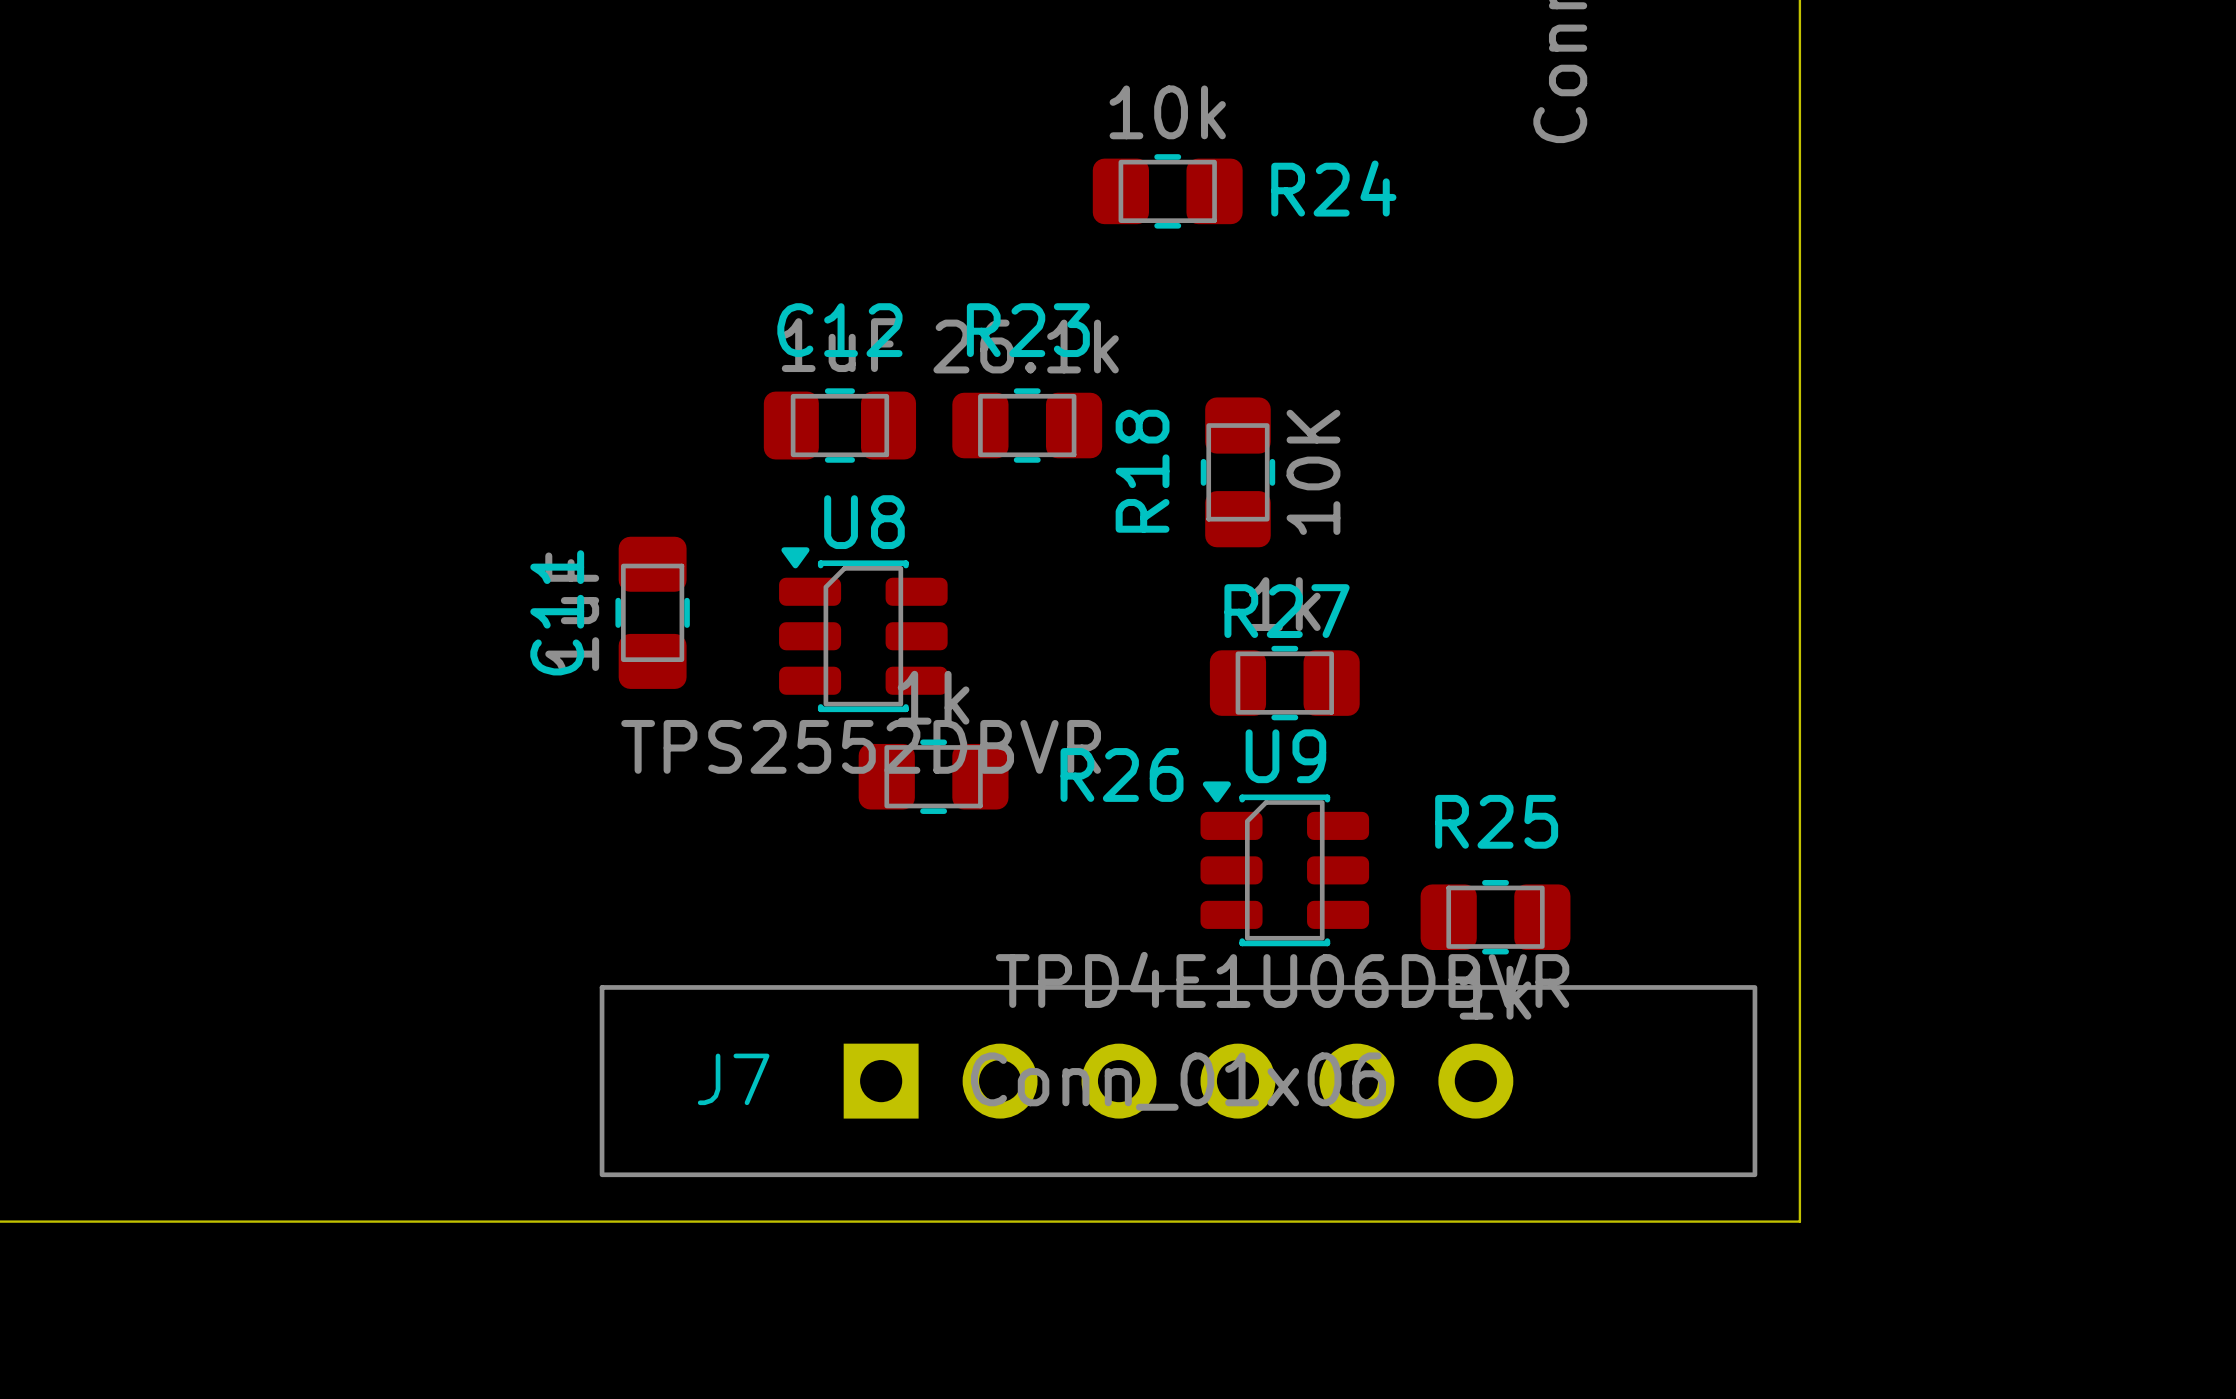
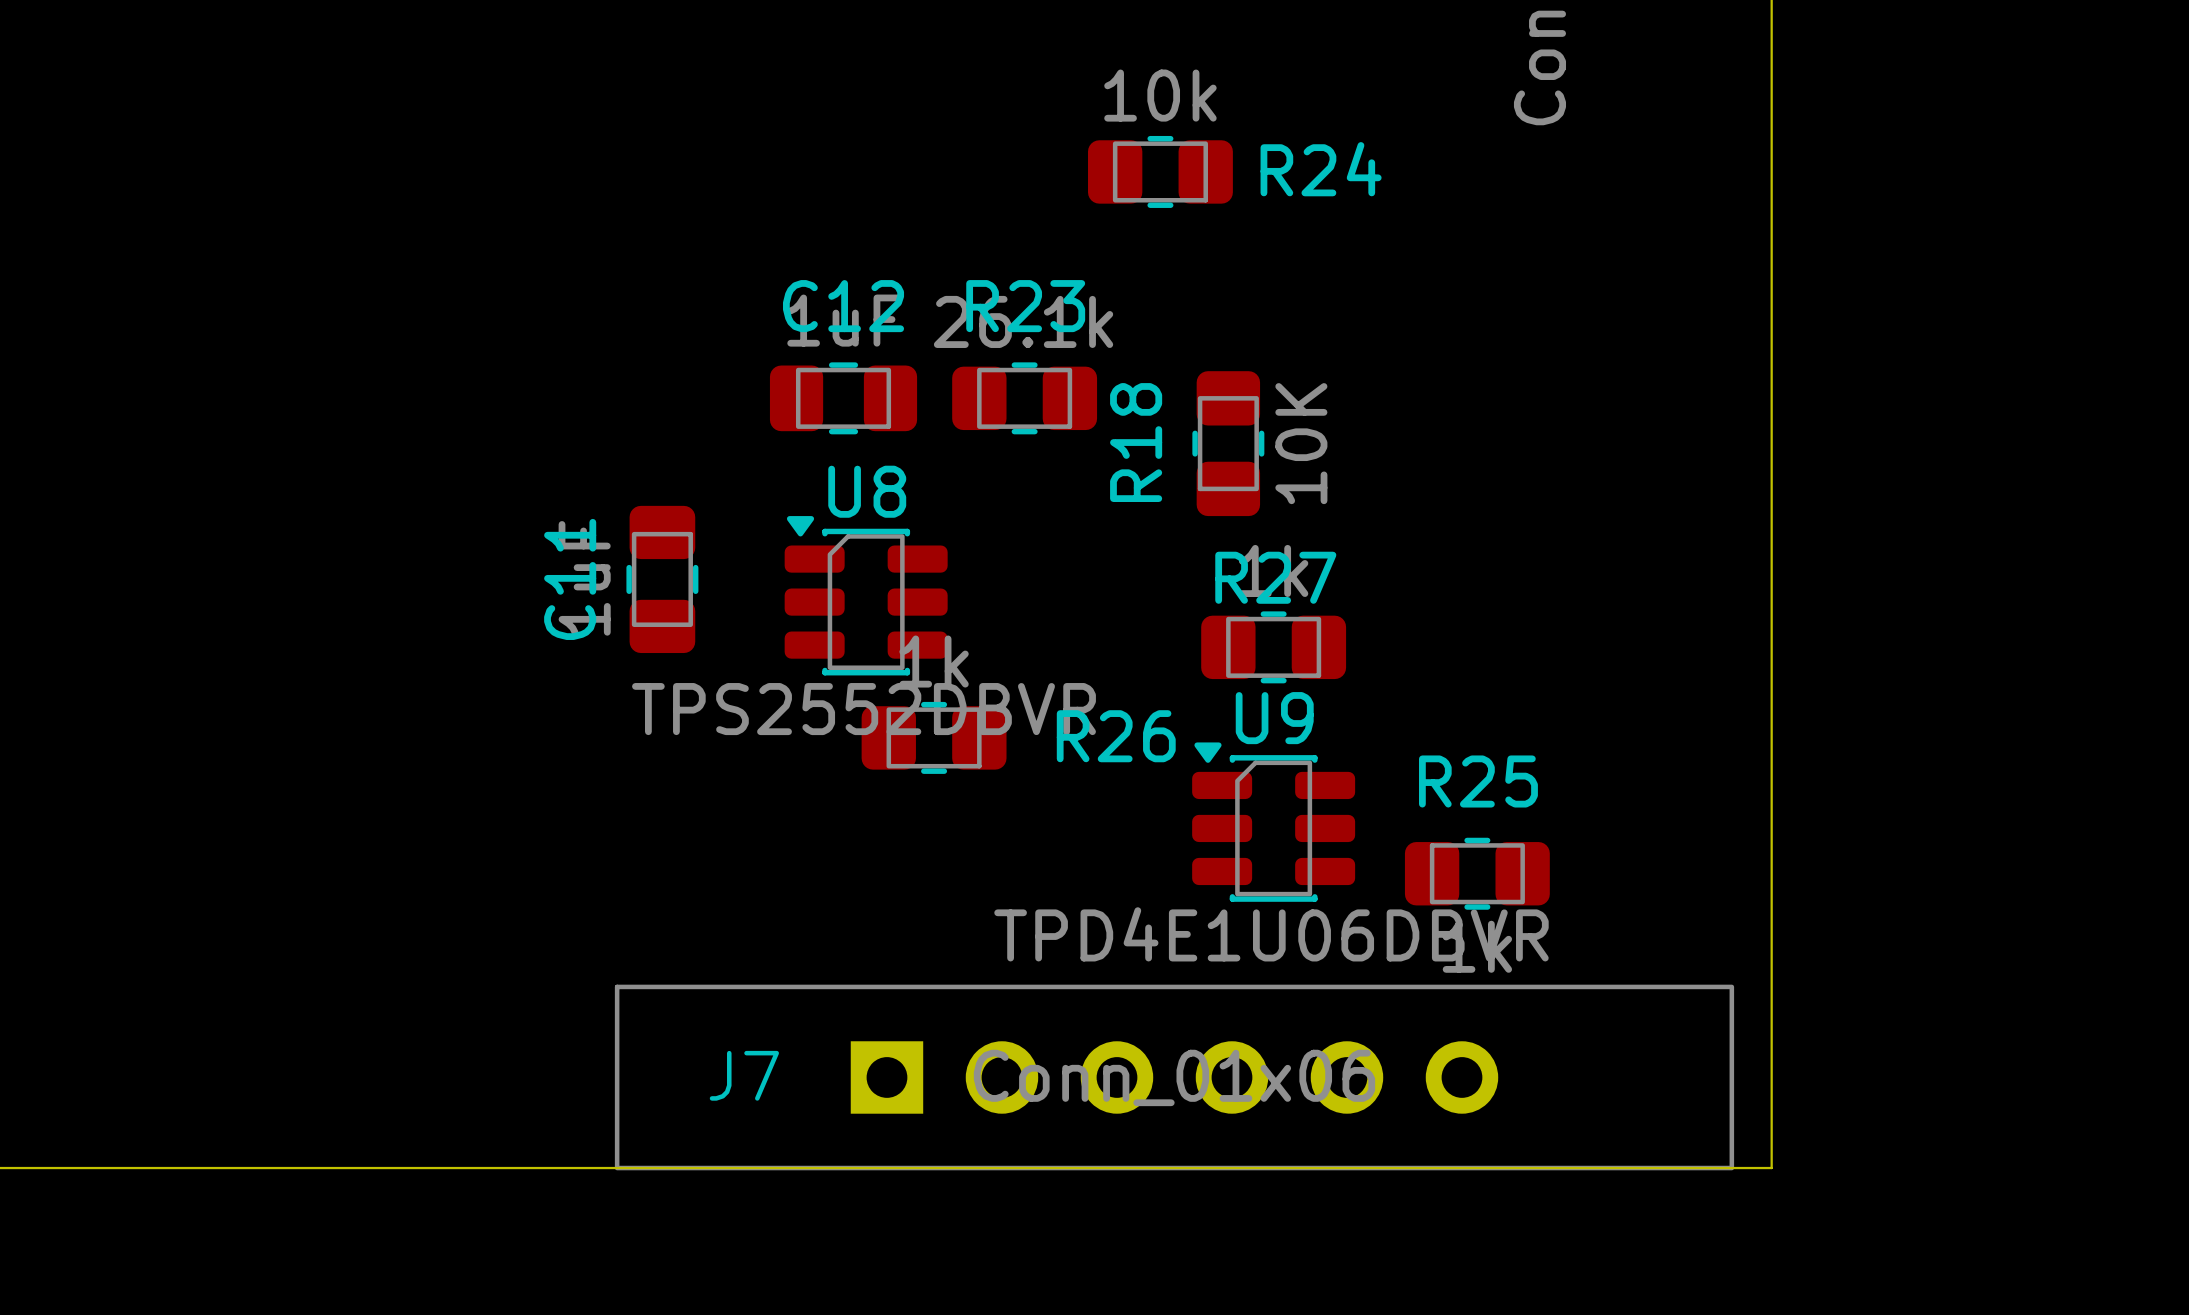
J7 position: (1178, 1081) -> (1174, 1077)

